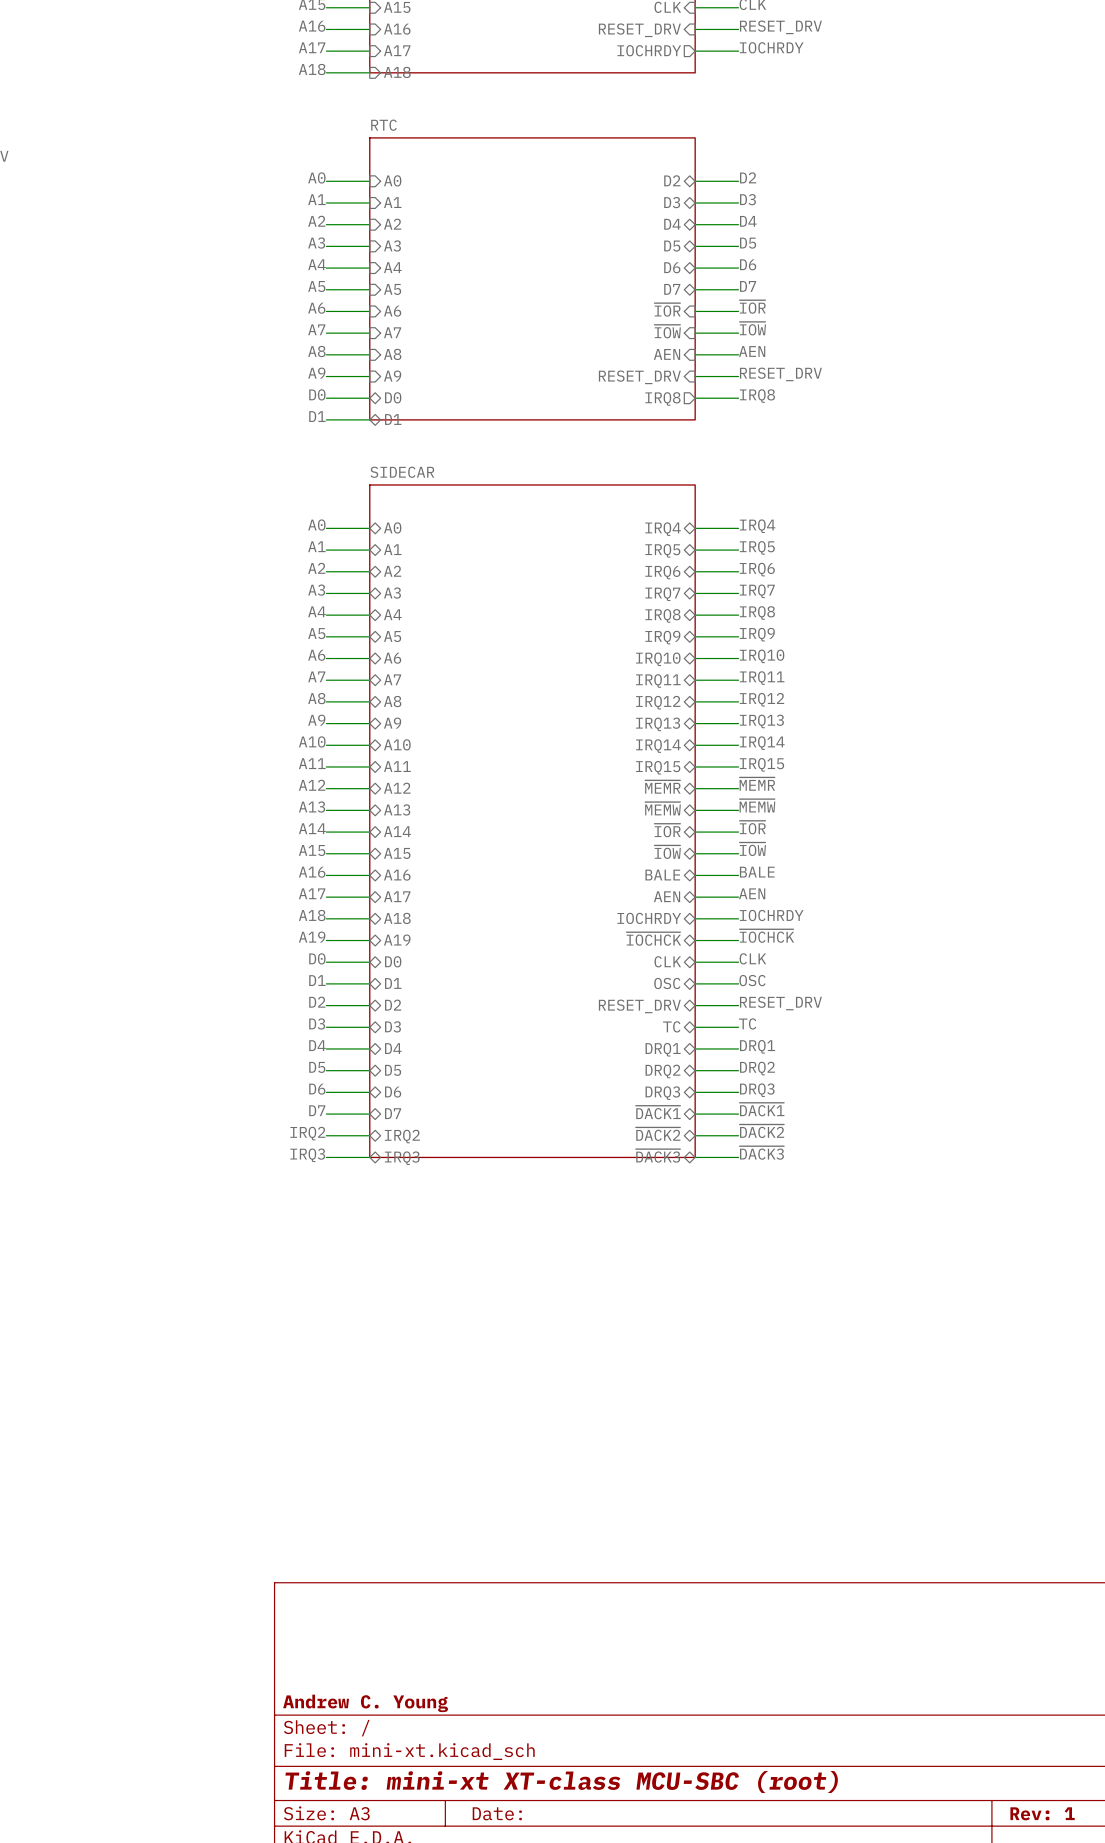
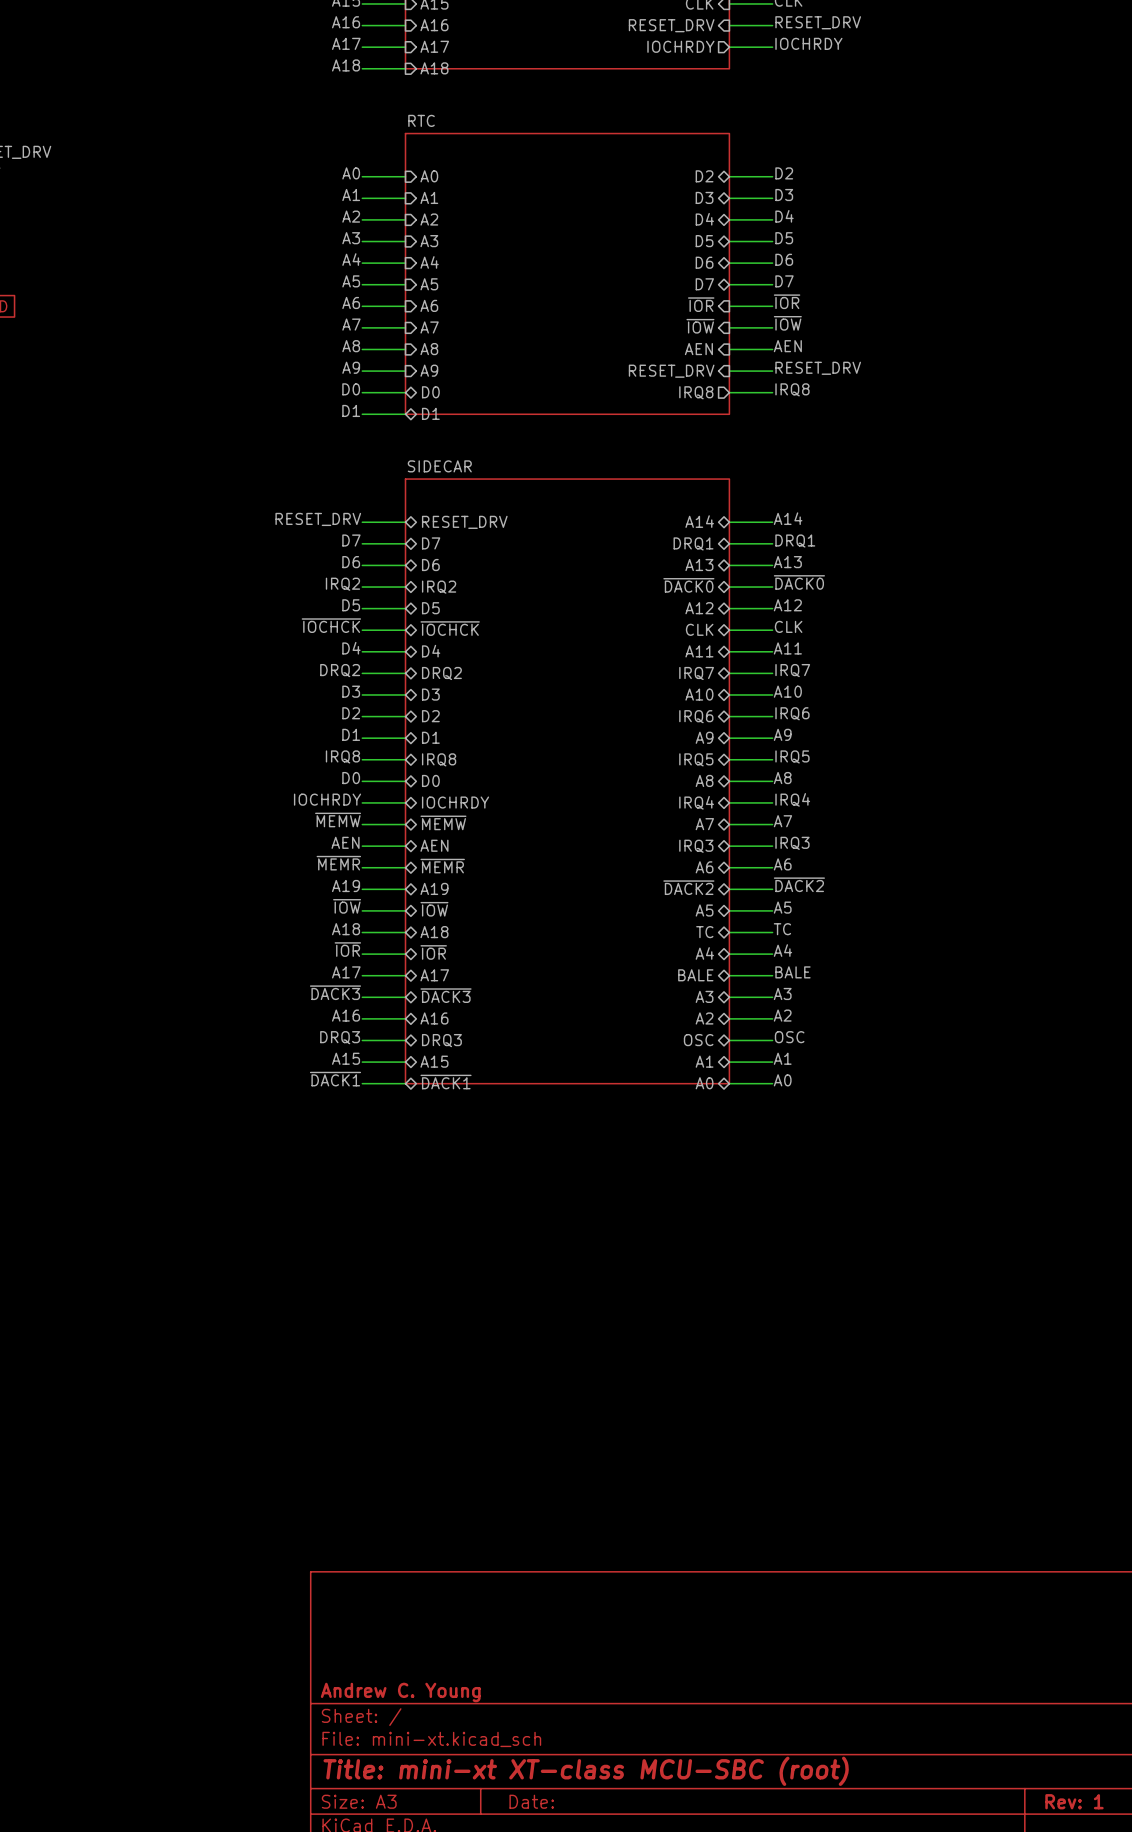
label: A0 (316, 525) -> RESET_DRV (318, 519)
label: IRQ4 (757, 526) -> A14 (788, 518)
sheet pin: A0 (392, 527) -> RESET_DRV (464, 522)
sheet pin: IRQ4 (663, 529) -> A14 (699, 521)
label: A1 (316, 546) -> D7 (351, 540)
label: IRQ5 (757, 547) -> DRQ1 (795, 541)
sheet pin: A1 (392, 549) -> D7 (431, 543)
sheet pin: IRQ5 (662, 550) -> DRQ1 (693, 543)
label: A2 (316, 568) -> D6 (351, 562)
label: IRQ6 (757, 569) -> A13 (787, 562)
sheet pin: A2 (392, 571) -> D6 (430, 565)
sheet pin: IRQ6 (662, 572) -> A13 (699, 565)
label: A3 (316, 590) -> IRQ2 (342, 584)
label: IRQ7 (757, 591) -> ~{DACK0} (799, 582)
sheet pin: A3 (392, 593) -> IRQ2 (439, 587)
sheet pin: IRQ7 (662, 594) -> ~{DACK0} (688, 585)
label: A4 (317, 611) -> D5 (351, 605)
label: IRQ8 (757, 612) -> A12 (787, 605)
sheet pin: A4 (392, 614) -> D5 (430, 608)
sheet pin: IRQ8 (662, 615) -> A12 (699, 608)
label: A5 (316, 633) -> ~{IOCHCK} (331, 625)
label: IRQ9 (757, 634) -> CLK (788, 626)
sheet pin: A5 (392, 636) -> ~{IOCHCK} (450, 628)
sheet pin: IRQ9 (662, 637) -> CLK (699, 629)
label: A6 (316, 655) -> D4 (351, 648)
label: IRQ10 (762, 656) -> A11 (787, 648)
sheet pin: A6 (392, 658) -> D4 (431, 651)
sheet pin: IRQ10 (658, 659) -> A11 (699, 651)
label: A7 (316, 676) -> DRQ2 (340, 670)
label: IRQ11 (762, 678) -> IRQ7 (792, 670)
sheet pin: A7 (392, 679) -> DRQ2 (441, 673)
sheet pin: IRQ11 (658, 680) -> IRQ7 (696, 673)
label: A8 (316, 698) -> D3 (351, 691)
label: IRQ12 (762, 699) -> A10 (787, 691)
sheet pin: A8 (392, 701) -> D3 (430, 694)
sheet pin: IRQ12 (658, 702) -> A10 (699, 694)
label: A9 (316, 720) -> D2 (351, 713)
label: IRQ13 (761, 721) -> IRQ6 (792, 713)
sheet pin: A9 (392, 723) -> D2 (430, 716)
sheet pin: IRQ13 (658, 724) -> IRQ6 (696, 716)
label: A10 (312, 741) -> D1 (351, 734)
label: IRQ14 (762, 743) -> A9 (782, 734)
sheet pin: A10 (397, 744) -> D1 (430, 737)
sheet pin: IRQ14 (658, 746) -> A9 (704, 737)
label: A11 (312, 763) -> IRQ8 (342, 756)
label: IRQ15 (761, 764) -> IRQ5 (792, 756)
sheet pin: A11 (397, 766) -> IRQ8 (439, 759)
sheet pin: IRQ15 (658, 767) -> IRQ5 (696, 759)
label: ~{MEMR} (757, 784) -> A8 (782, 778)
label: A12 (312, 785) -> D0 (351, 778)
sheet pin: ~{MEMR} (662, 787) -> A8 (704, 780)
sheet pin: A12 (397, 788) -> D0 (430, 780)
sheet SIDECAR: none -> (567, 781)
label: ~{MEMW} (757, 805) -> IRQ4 (792, 799)
label: A13 (312, 807) -> IOCHRDY (327, 799)
sheet pin: ~{MEMW} (662, 808) -> IRQ4 (696, 802)
sheet pin: A13 (397, 809) -> IOCHRDY (455, 802)
sheet SIDECAR: (532, 821) -> none
label: ~{IOR} (752, 827) -> A7 (782, 821)
label: A14 (312, 828) -> ~{MEMW} (338, 819)
sheet pin: ~{IOR} (667, 830) -> A7 (704, 824)
sheet pin: A14 (397, 831) -> ~{MEMW} (443, 822)
label: ~{IOW} (752, 849) -> IRQ3 (792, 843)
label: A15 (312, 850) -> AEN (345, 842)
sheet pin: ~{IOW} (667, 852) -> IRQ3 (696, 846)
sheet pin: A15 (397, 853) -> AEN (434, 845)
label: A16 (312, 872) -> ~{MEMR} (338, 863)
label: BALE (757, 872) -> A6 (782, 864)
sheet pin: A16 (397, 875) -> ~{MEMR} (442, 866)
sheet pin: BALE (662, 875) -> A6 (704, 867)
label: A17 (312, 893) -> A19 (346, 886)
label: AEN (752, 893) -> ~{DACK2} (799, 884)
sheet pin: A17 (397, 896) -> A19 (434, 888)
sheet pin: AEN (667, 896) -> ~{DACK2} (688, 887)
label: A18 (312, 915) -> ~{IOW} (347, 906)
label: IOCHRDY (771, 915) -> A5 (782, 907)
sheet pin: A18 (397, 918) -> ~{IOW} (434, 909)
sheet pin: IOCHRDY (649, 918) -> A5 (704, 910)
label: ~{IOCHCK} (766, 936) -> TC (782, 929)
label: A19 (312, 937) -> A18 (346, 929)
sheet pin: ~{IOCHCK} (653, 938) -> TC (704, 932)
sheet pin: A19 (397, 940) -> A18 (434, 932)
label: D0 (317, 958) -> ~{IOR} (347, 949)
label: CLK (752, 958) -> A4 (782, 950)
sheet pin: D0 (393, 961) -> ~{IOR} (433, 952)
sheet pin: CLK (667, 961) -> A4 (704, 953)
label: D1 (317, 980) -> A17 (346, 972)
label: OSC (752, 980) -> BALE (792, 972)
sheet pin: D1 (393, 983) -> A17 (434, 975)
sheet pin: OSC (667, 983) -> BALE (695, 975)
label: D2 (317, 1002) -> ~{DACK3} (335, 992)
label: RESET_DRV (780, 1003) -> A3 (782, 993)
sheet pin: D2 (393, 1005) -> ~{DACK3} (446, 995)
sheet pin: RESET_DRV (639, 1006) -> A3 (704, 996)
label: D3 (317, 1023) -> A16 (346, 1015)
label: TC (747, 1023) -> A2 (782, 1015)
sheet pin: D3 (392, 1026) -> A16 (434, 1018)
sheet pin: TC (671, 1026) -> A2 (704, 1018)
label: D4 (317, 1045) -> DRQ3 (340, 1037)
label: DRQ1 (757, 1046) -> OSC (789, 1037)
sheet pin: D4 (393, 1048) -> DRQ3 (441, 1040)
sheet pin: DRQ1 (663, 1049) -> OSC (698, 1040)
label: D5 (317, 1067) -> A15 (346, 1058)
label: DRQ2 (757, 1068) -> A1 (782, 1058)
sheet pin: D5 (393, 1070) -> A15 (434, 1061)
sheet pin: DRQ2 (662, 1071) -> A1 (704, 1061)
label: D6 (317, 1089) -> ~{DACK1} (335, 1079)
label: DRQ3 (757, 1090) -> A0 (782, 1080)
sheet pin: D6 (393, 1092) -> ~{DACK1} (446, 1082)
sheet pin: DRQ3 (662, 1093) -> A0 (704, 1083)
label: ~{DACK1} (762, 1109) -> none
label: D7 (317, 1110) -> none
sheet pin: ~{DACK1} (658, 1112) -> none
sheet pin: D7 (393, 1113) -> none
wire: (326, 1114) (369, 1114) -> none
wire: (695, 1114) (738, 1114) -> none
label: ~{DACK2} (761, 1131) -> none
label: IRQ2 (307, 1133) -> none
sheet pin: ~{DACK2} (658, 1134) -> none
wire: (326, 1135) (369, 1135) -> none
wire: (695, 1135) (738, 1135) -> none
sheet pin: IRQ2 (402, 1136) -> none
label: ~{DACK3} (761, 1152) -> none
label: IRQ3 (307, 1155) -> none
sheet pin: ~{DACK3} (658, 1155) -> none
wire: (326, 1157) (369, 1157) -> none
wire: (695, 1157) (738, 1157) -> none
sheet pin: IRQ3 (402, 1158) -> none

